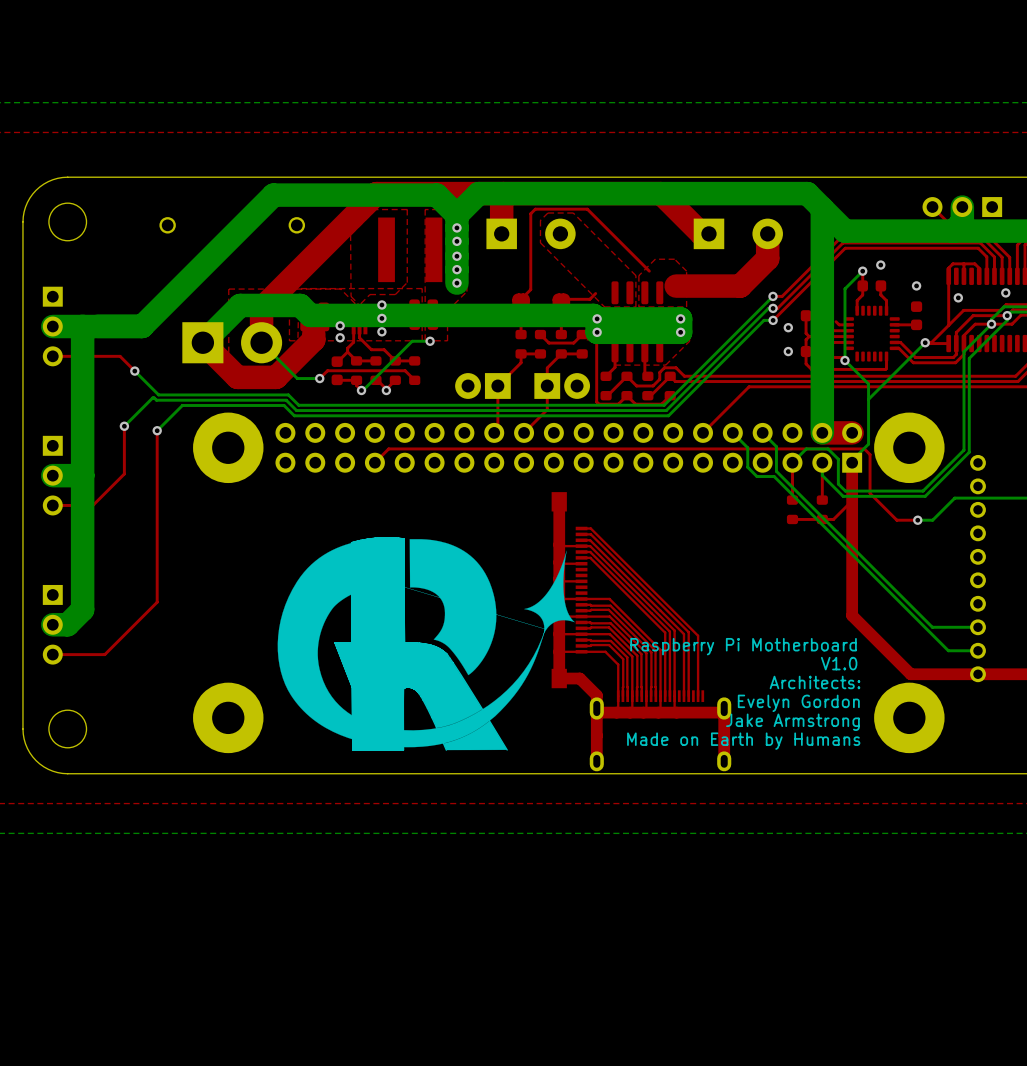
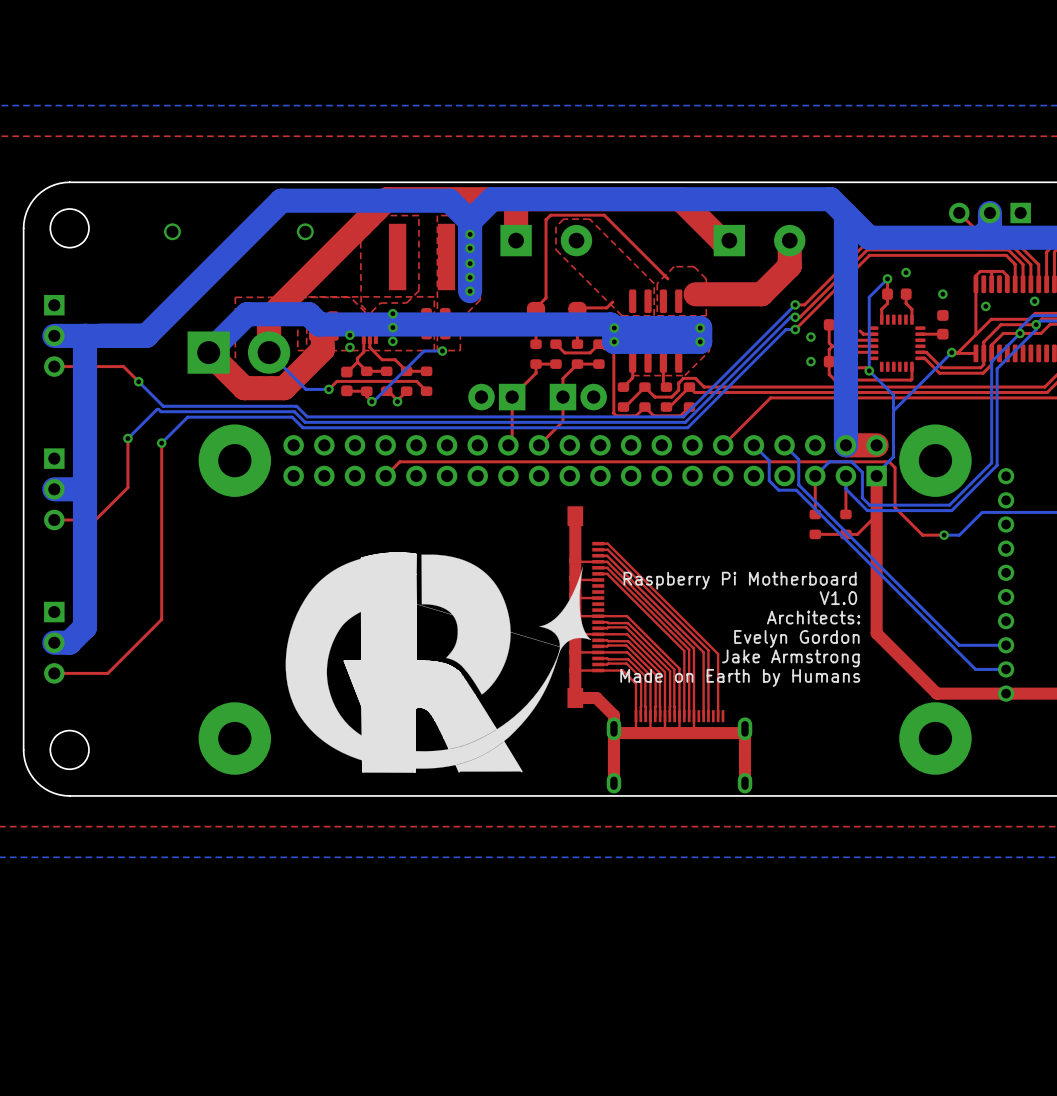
text position: Raspberry Pi Motherboard (743, 646) -> Raspberry Pi Motherboard (740, 580)
text position: V1.0 (839, 663) -> V1.0 (838, 598)
text position: Architects: (815, 682) -> Architects: (813, 617)
text position: Evelyn Gordon (798, 703) -> Evelyn Gordon (796, 638)
text position: Jake Armstrong (792, 722) -> Jake Armstrong (790, 658)
text position: Made on Earth by Humans (743, 741) -> Made on Earth by Humans (740, 677)

